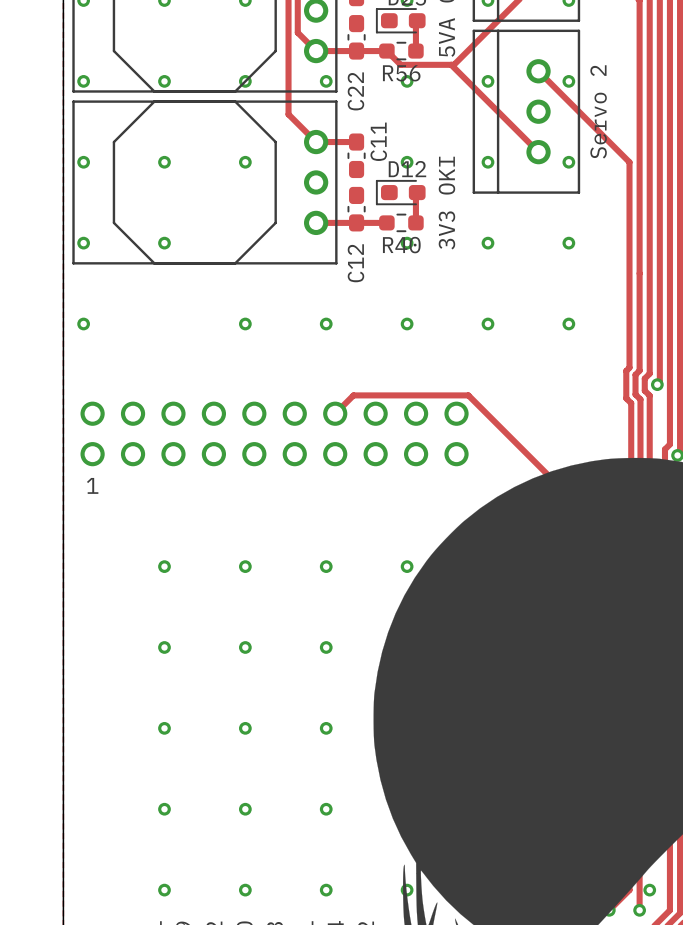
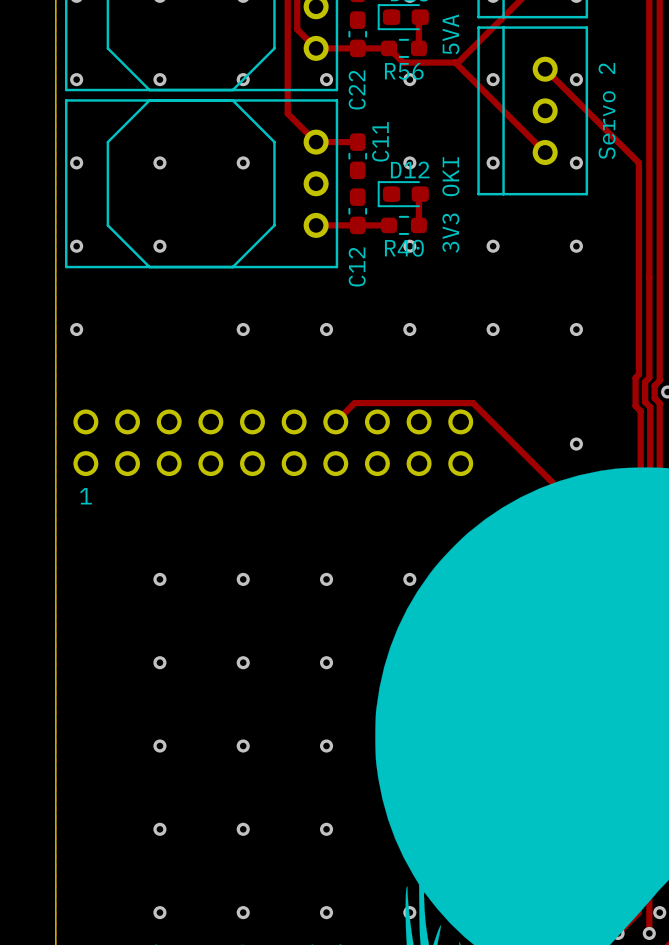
via: none -> (576, 444)

